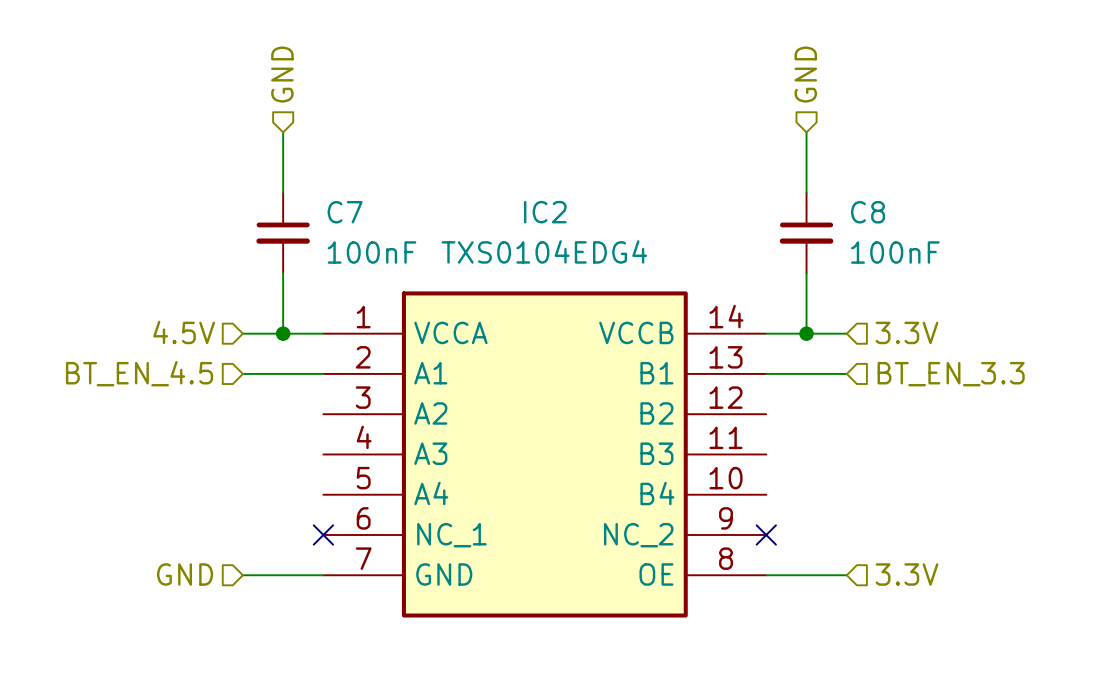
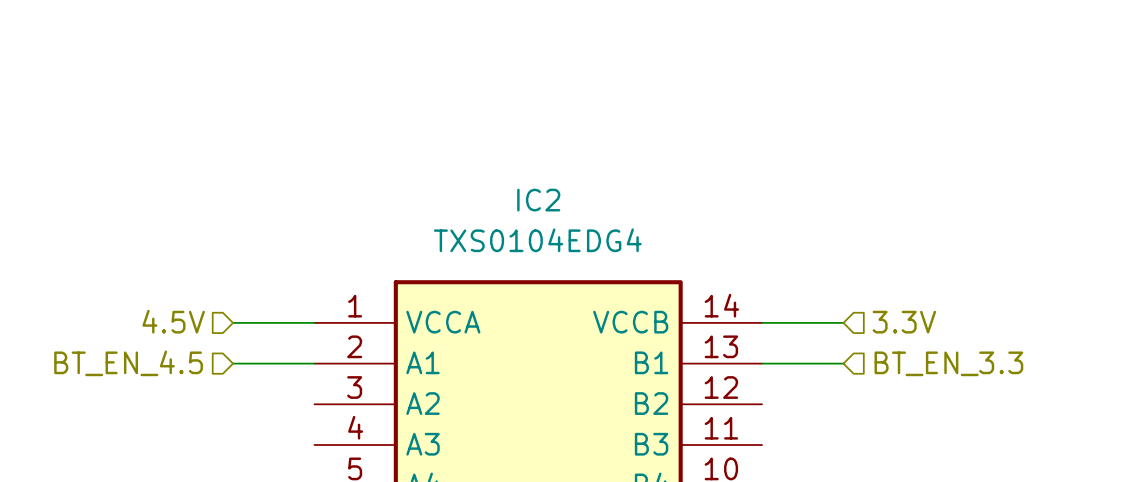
hierarchical label: GND (282, 74) -> none
hierarchical label: GND (805, 74) -> none
wire: (283, 132) (283, 192) -> none
wire: (806, 132) (806, 192) -> none
C7: 100nF (283, 233) -> none
C8: 100nF (806, 233) -> none
wire: (283, 273) (283, 333) -> none
wire: (806, 273) (806, 333) -> none
junction: (283, 333) -> none
junction: (806, 333) -> none

